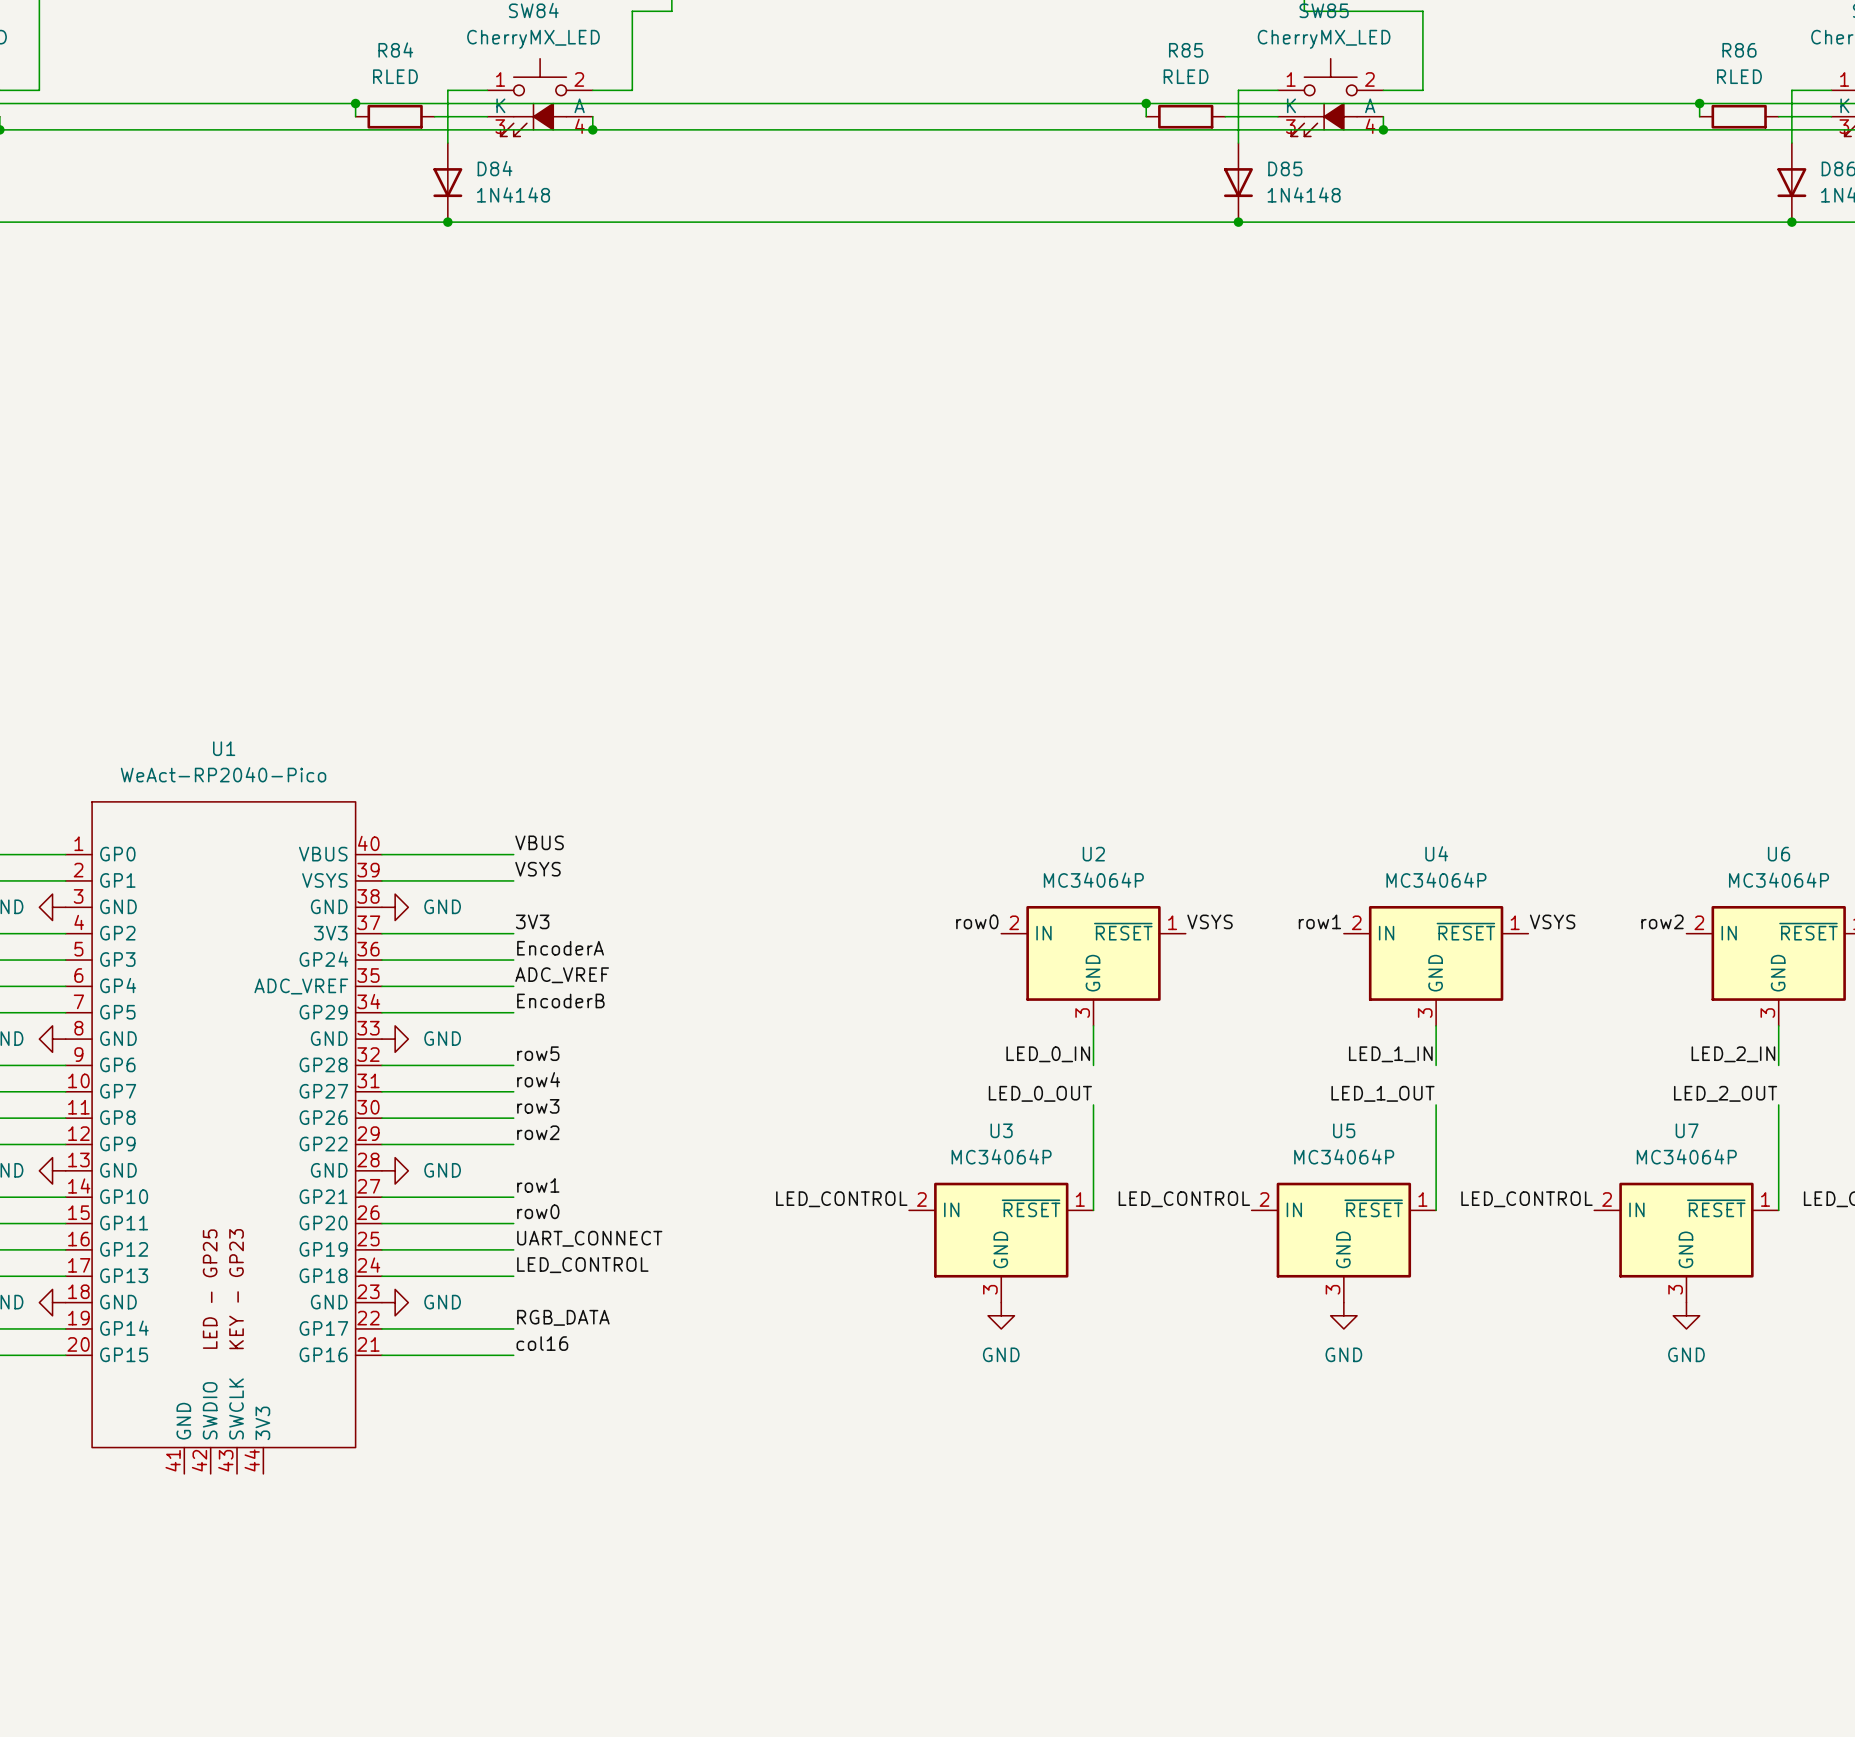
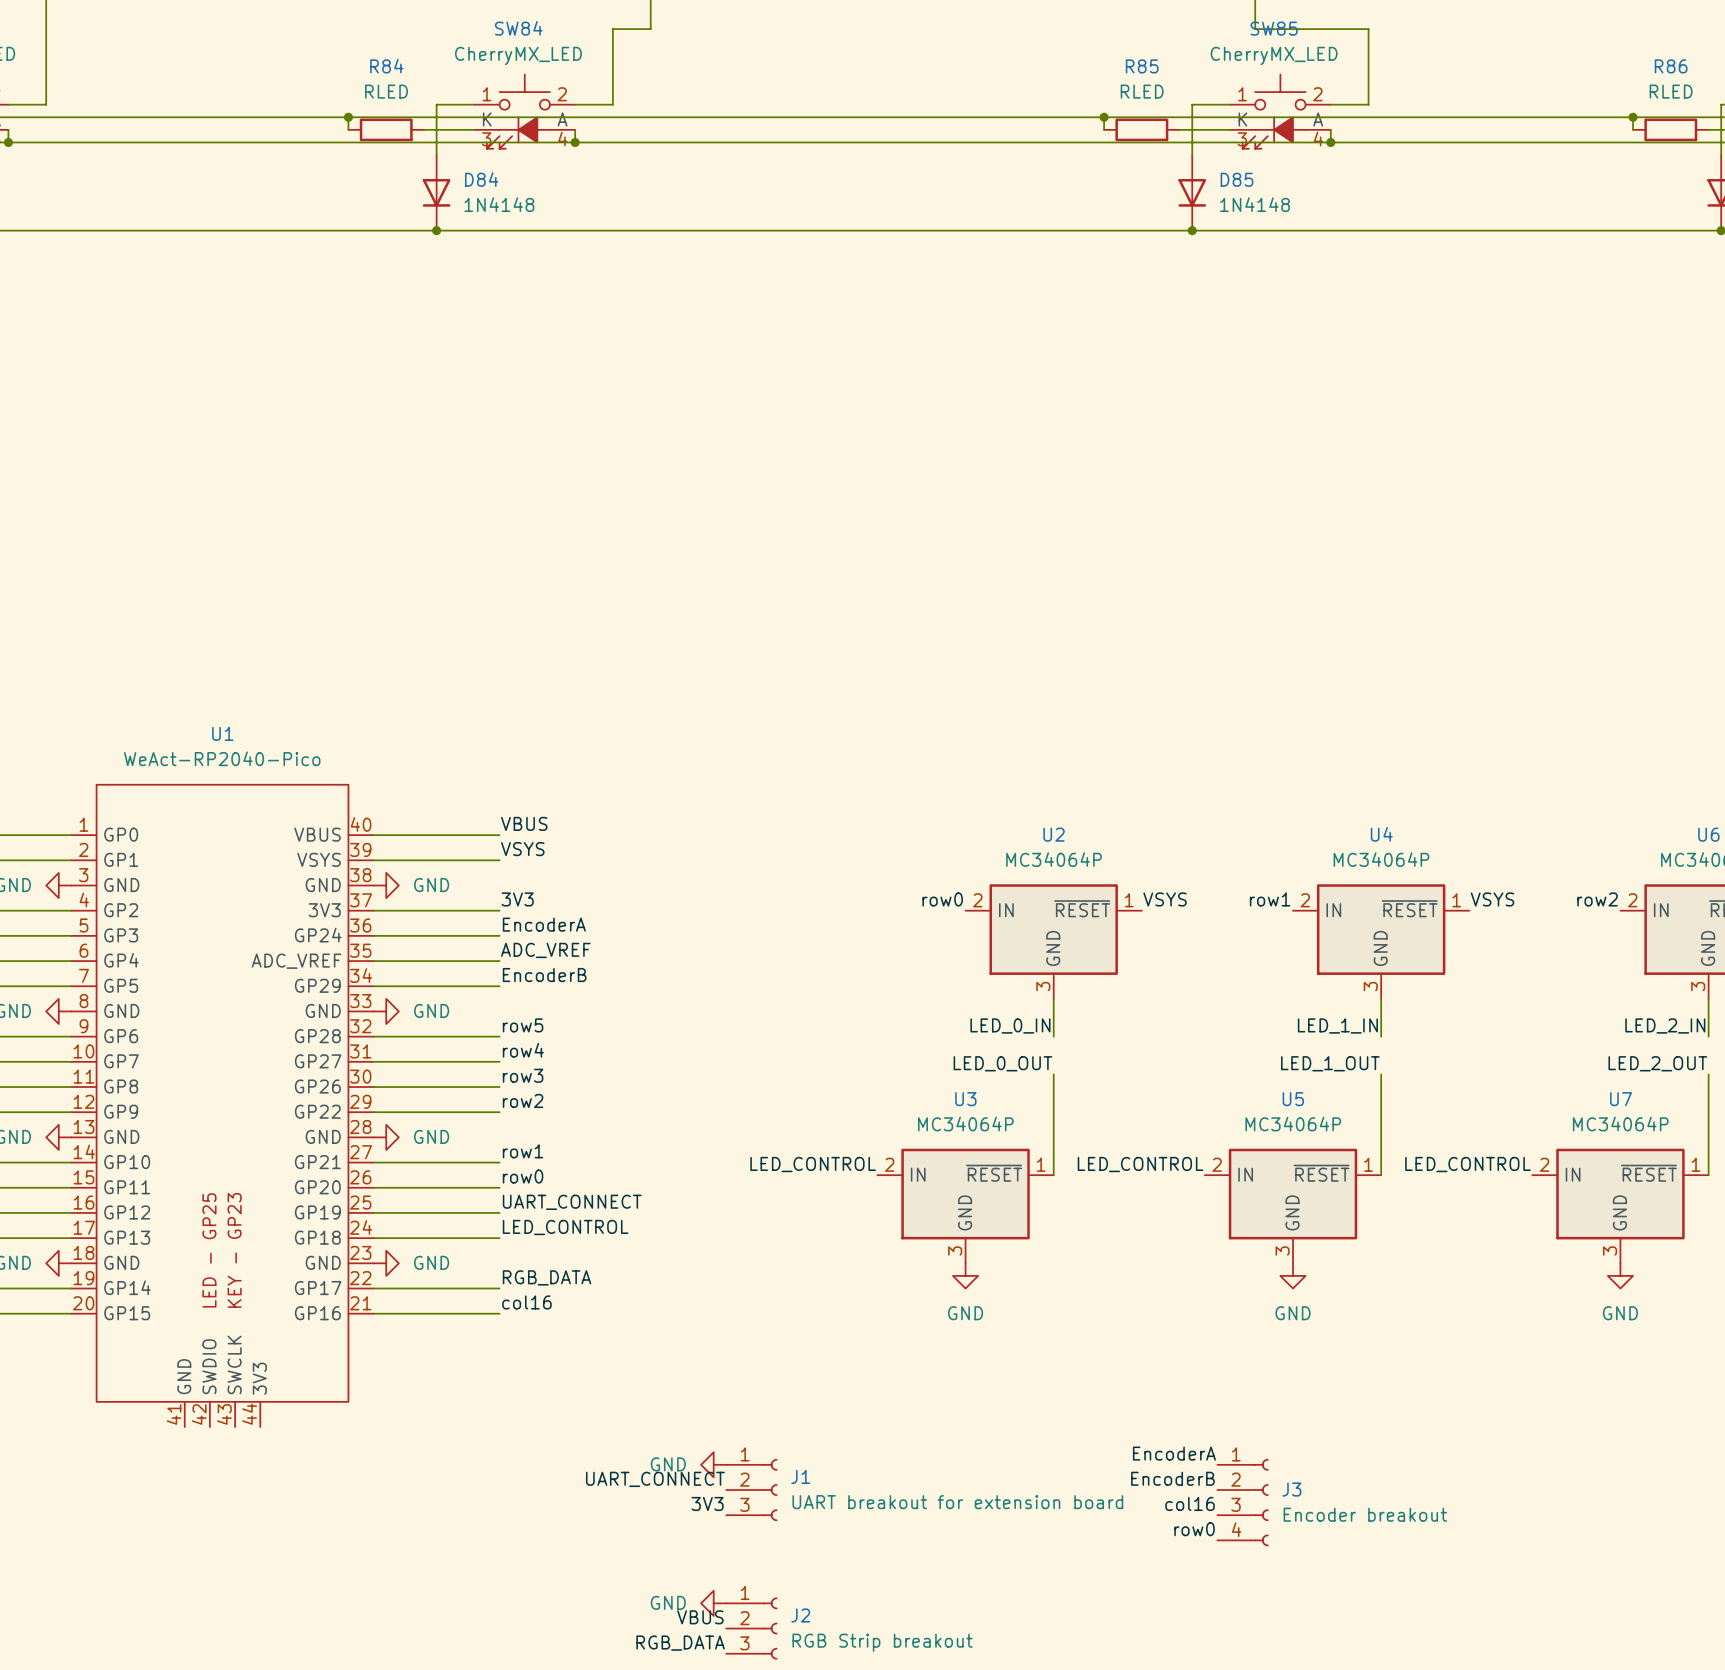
label: none -> EncoderA (1174, 1453)
power symbol: none -> GND (713, 1464)
label: none -> UART_CONNECT (655, 1479)
label: none -> EncoderB (1172, 1478)
J1: none -> UART breakout for extension board (751, 1490)
J3: none -> Encoder breakout (1243, 1502)
label: none -> 3V3 (707, 1503)
label: none -> col16 (1190, 1503)
label: none -> row0 (1194, 1529)
power symbol: none -> GND (713, 1603)
label: none -> VBUS (700, 1617)
J2: none -> RGB Strip breakout (751, 1628)
label: none -> RGB_DATA (680, 1643)

